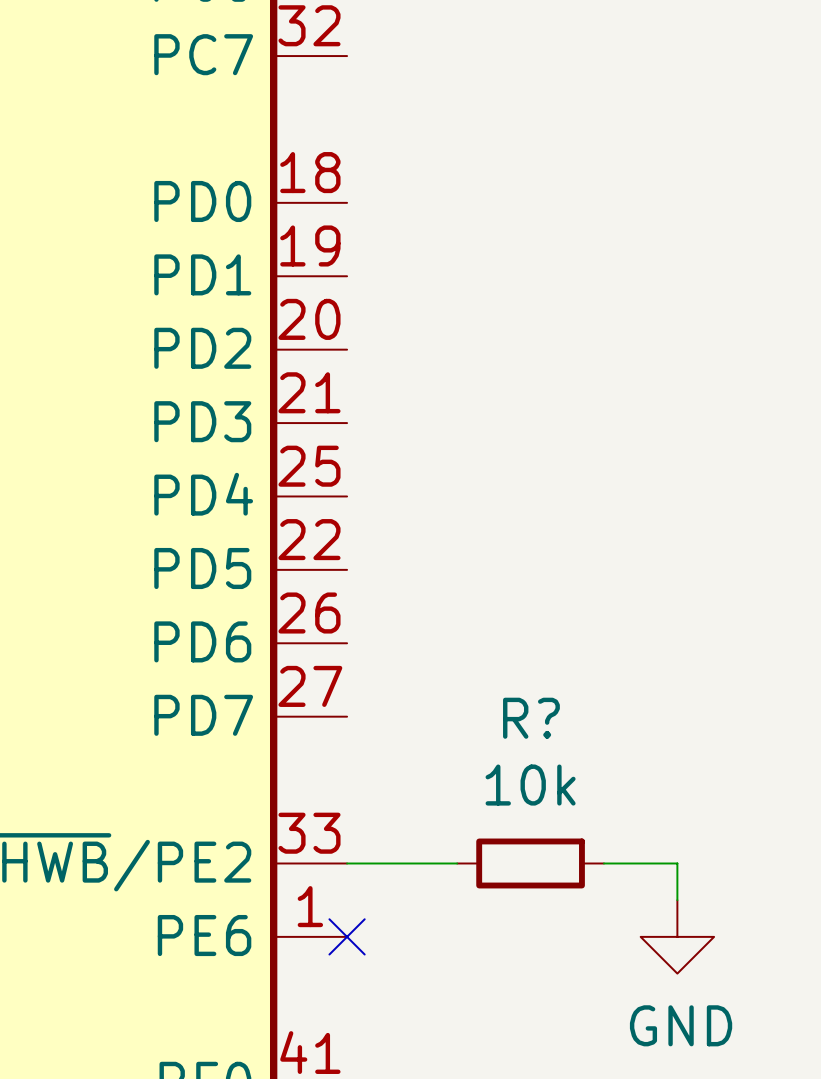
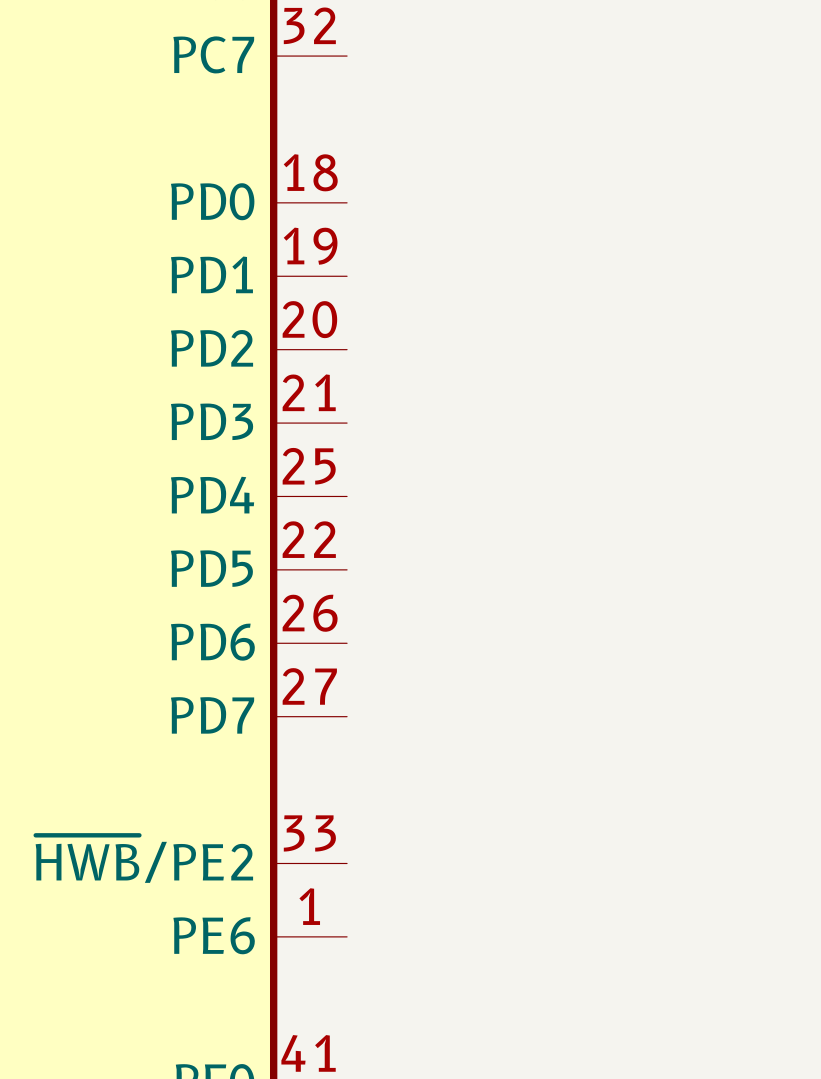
wire: (347, 863) (457, 863) -> none
R?: 10k (530, 863) -> none
wire: (603, 863) (677, 863) (677, 900) -> none
no-connect mark: (347, 936) -> none
power symbol: GND (677, 936) -> none

